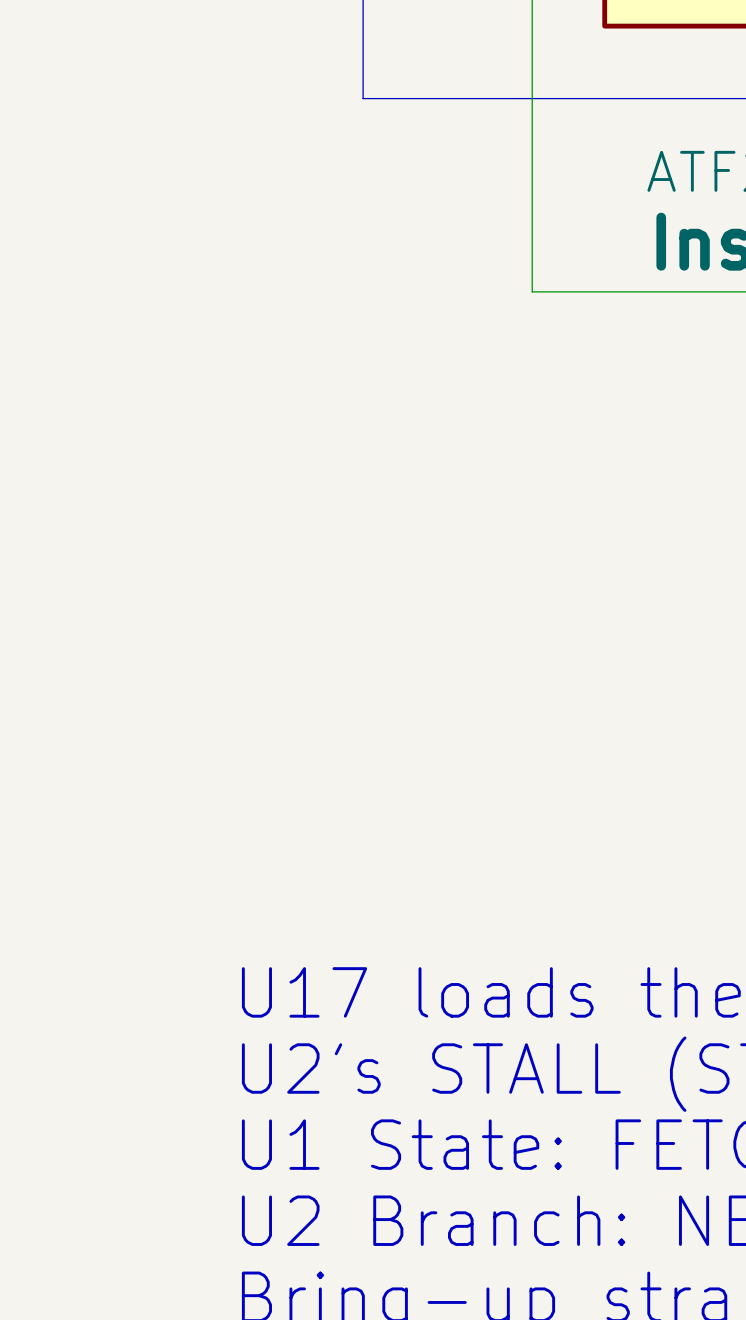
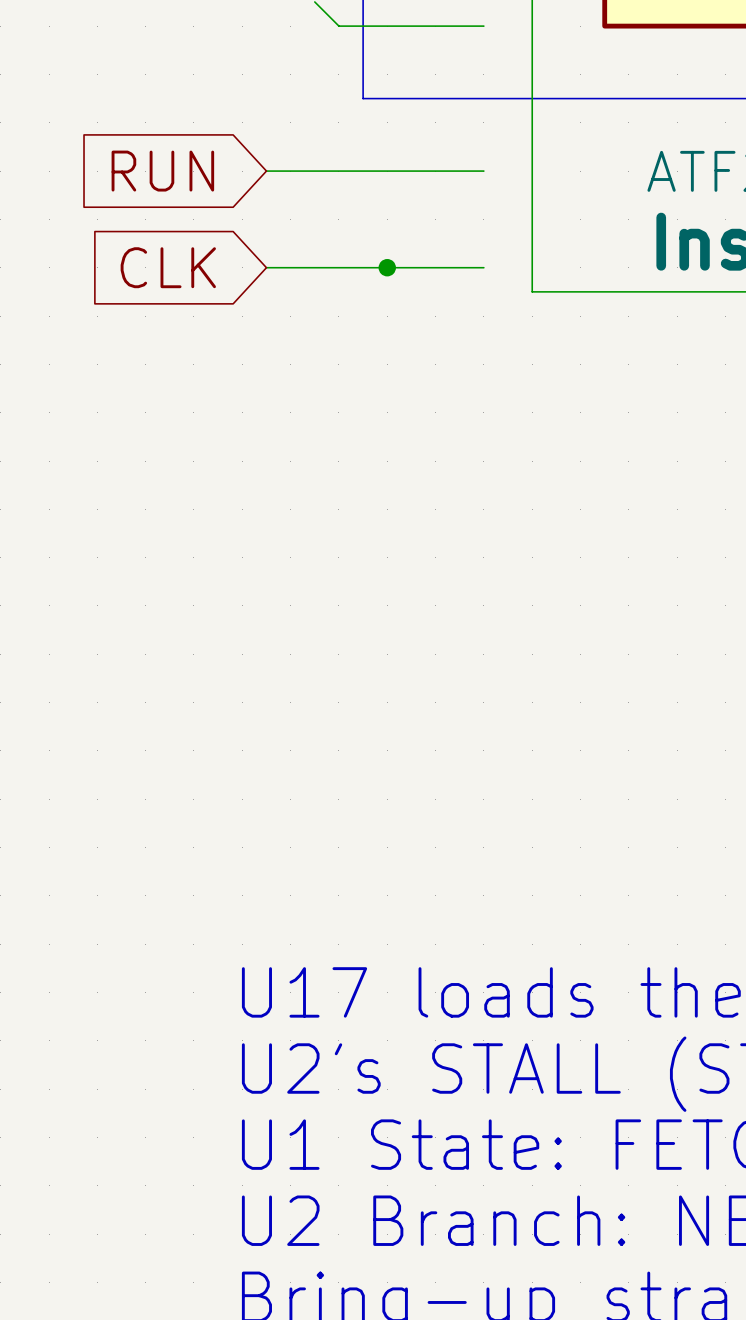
wire: none -> (314, 1) (338, 26) (483, 26)
global label: none -> RUN (162, 171)
wire: none -> (266, 171) (483, 171)
global label: none -> CLK (168, 267)
wire: none -> (266, 267) (483, 267)
junction: none -> (387, 267)

